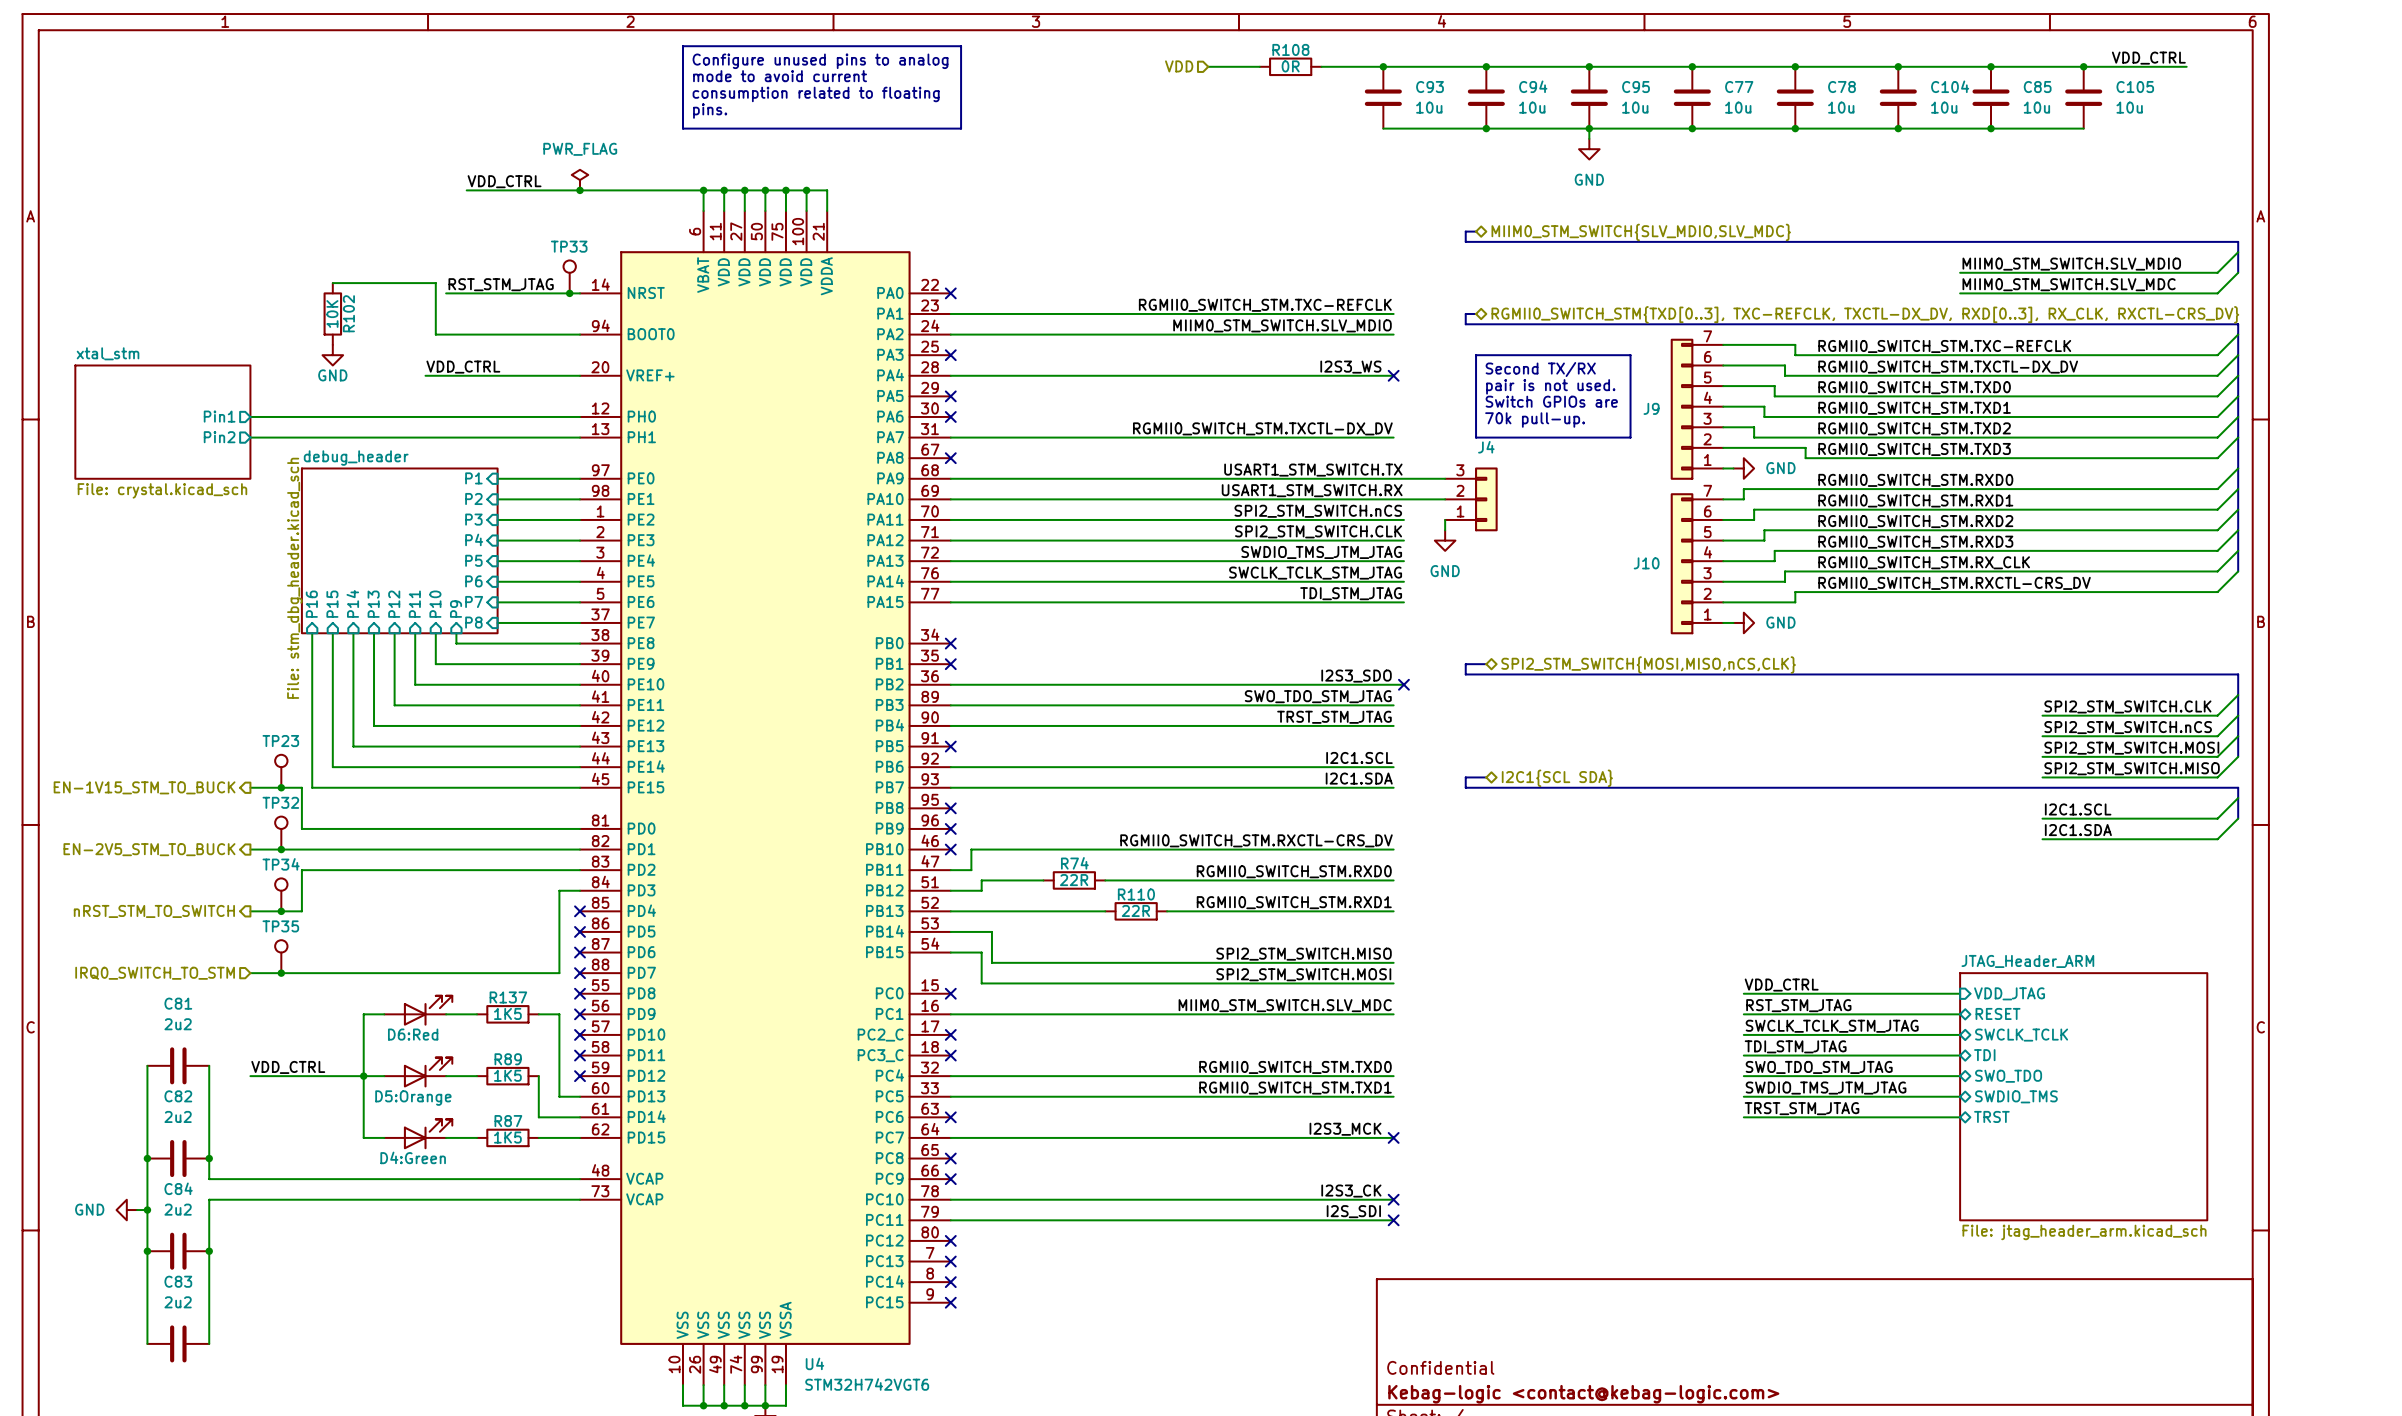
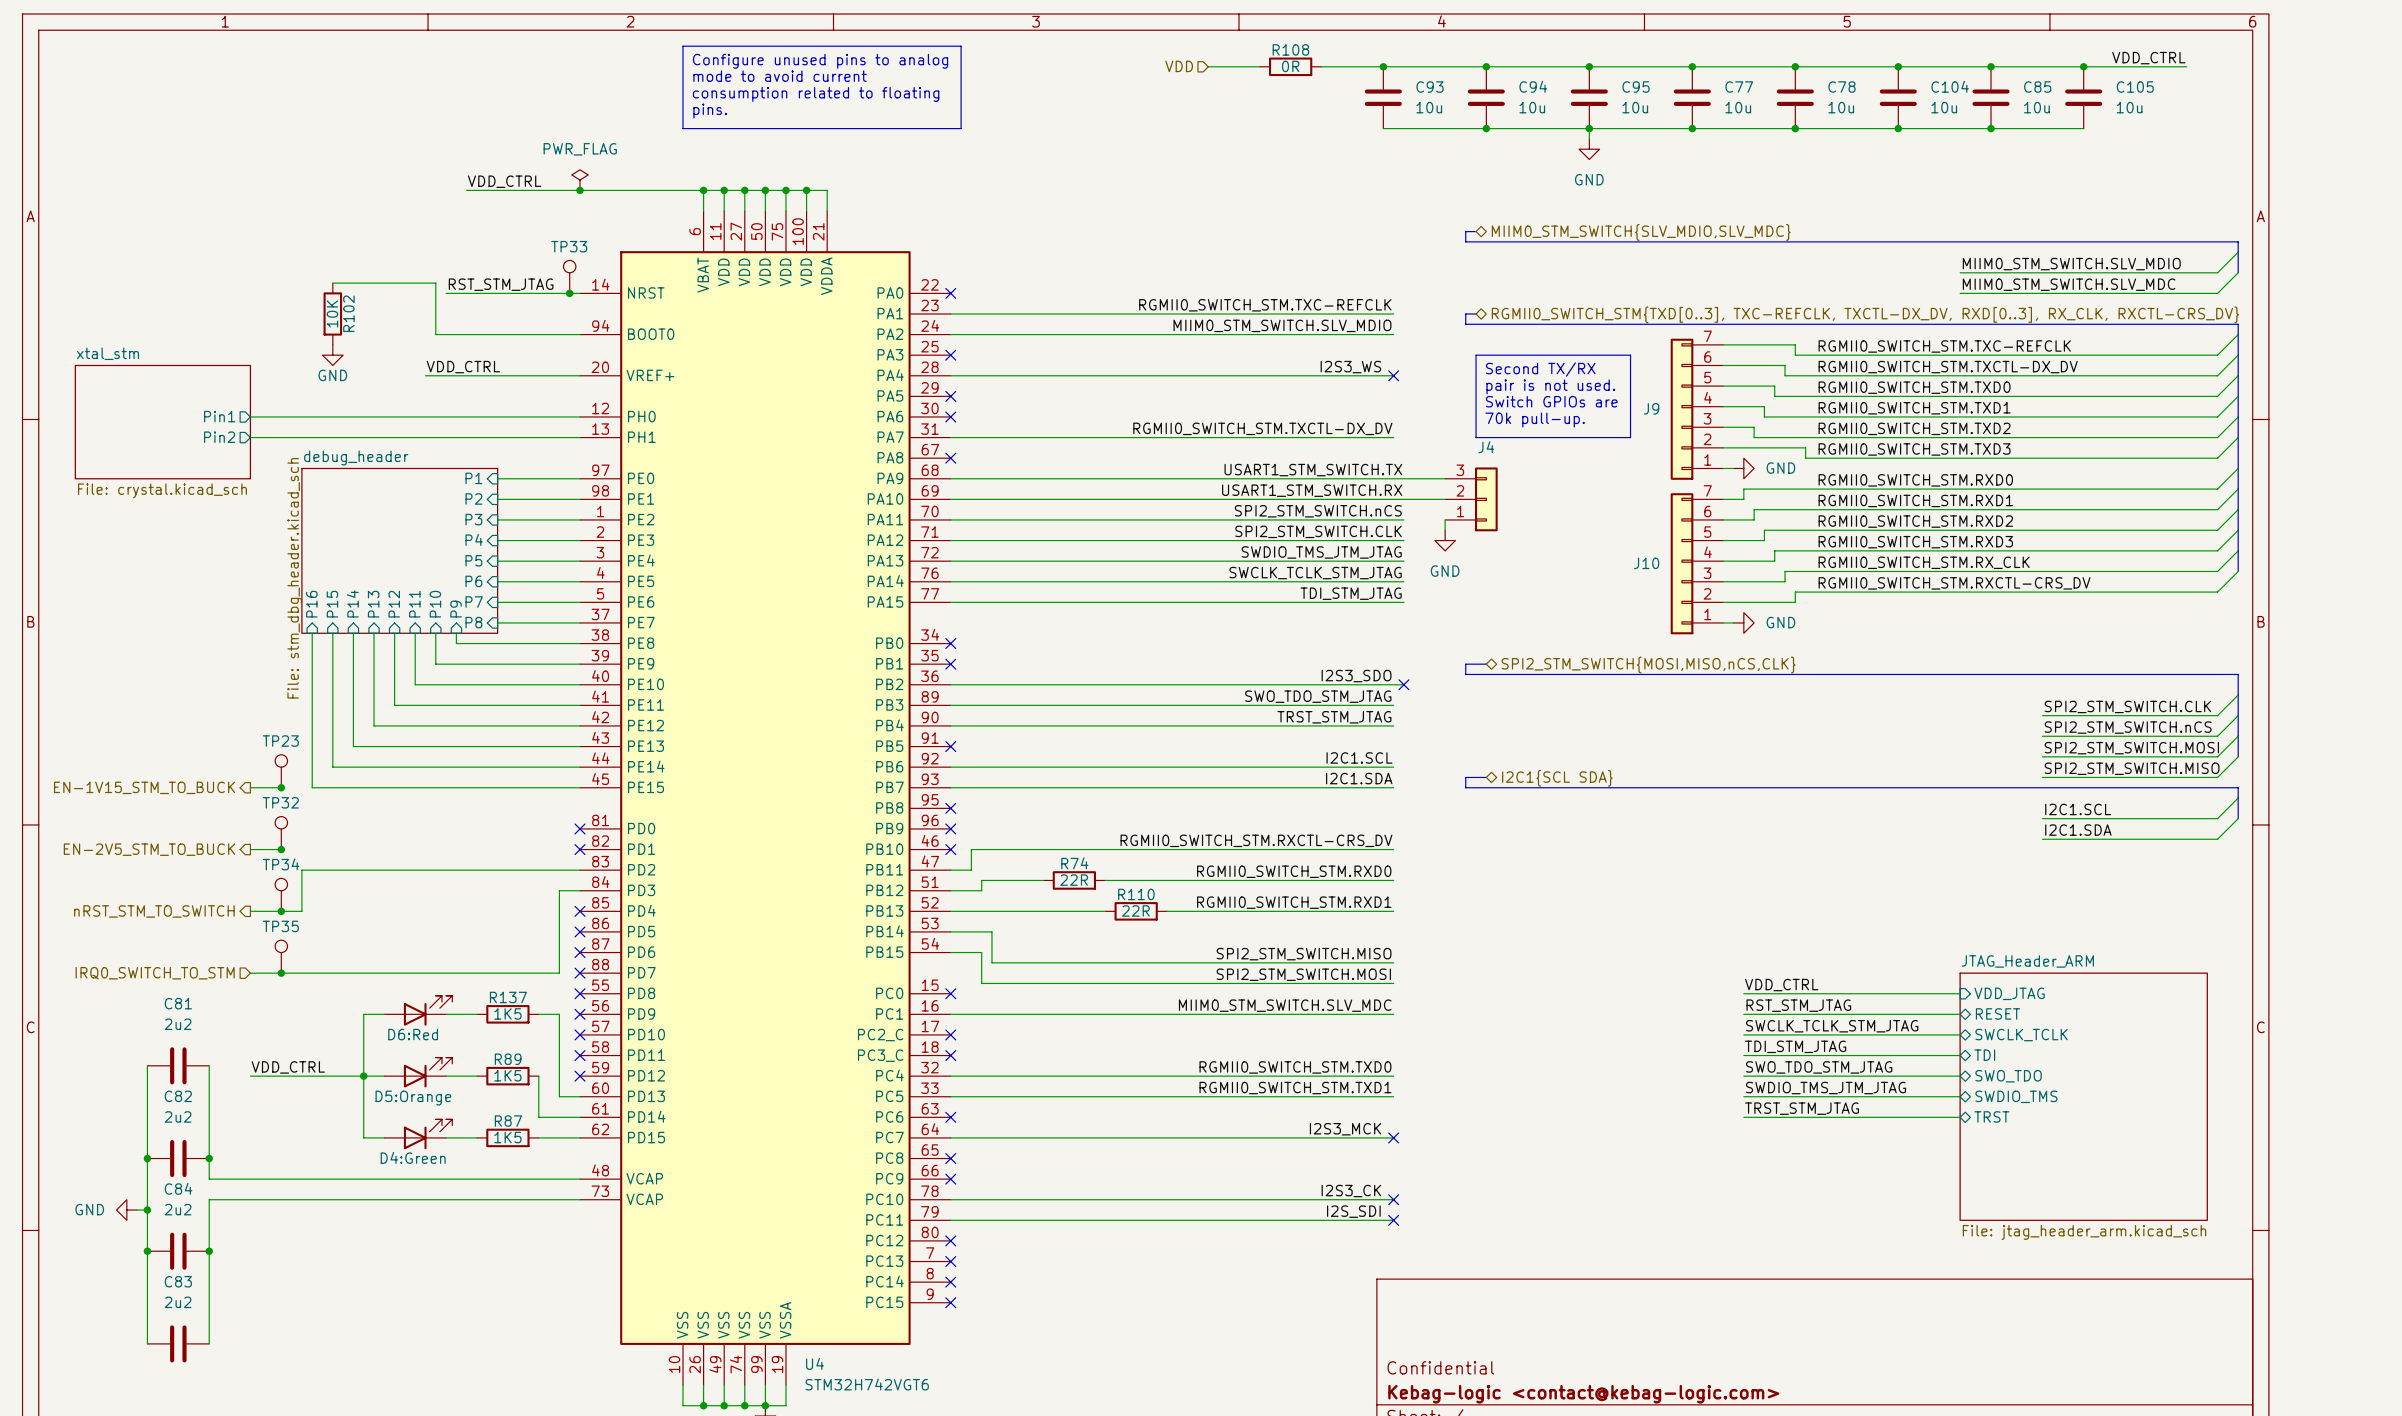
wire: (281, 787) (301, 787) (301, 828) (580, 828) -> none
no-connect mark: none -> (580, 828)
wire: (281, 849) (580, 849) -> none
no-connect mark: none -> (580, 849)

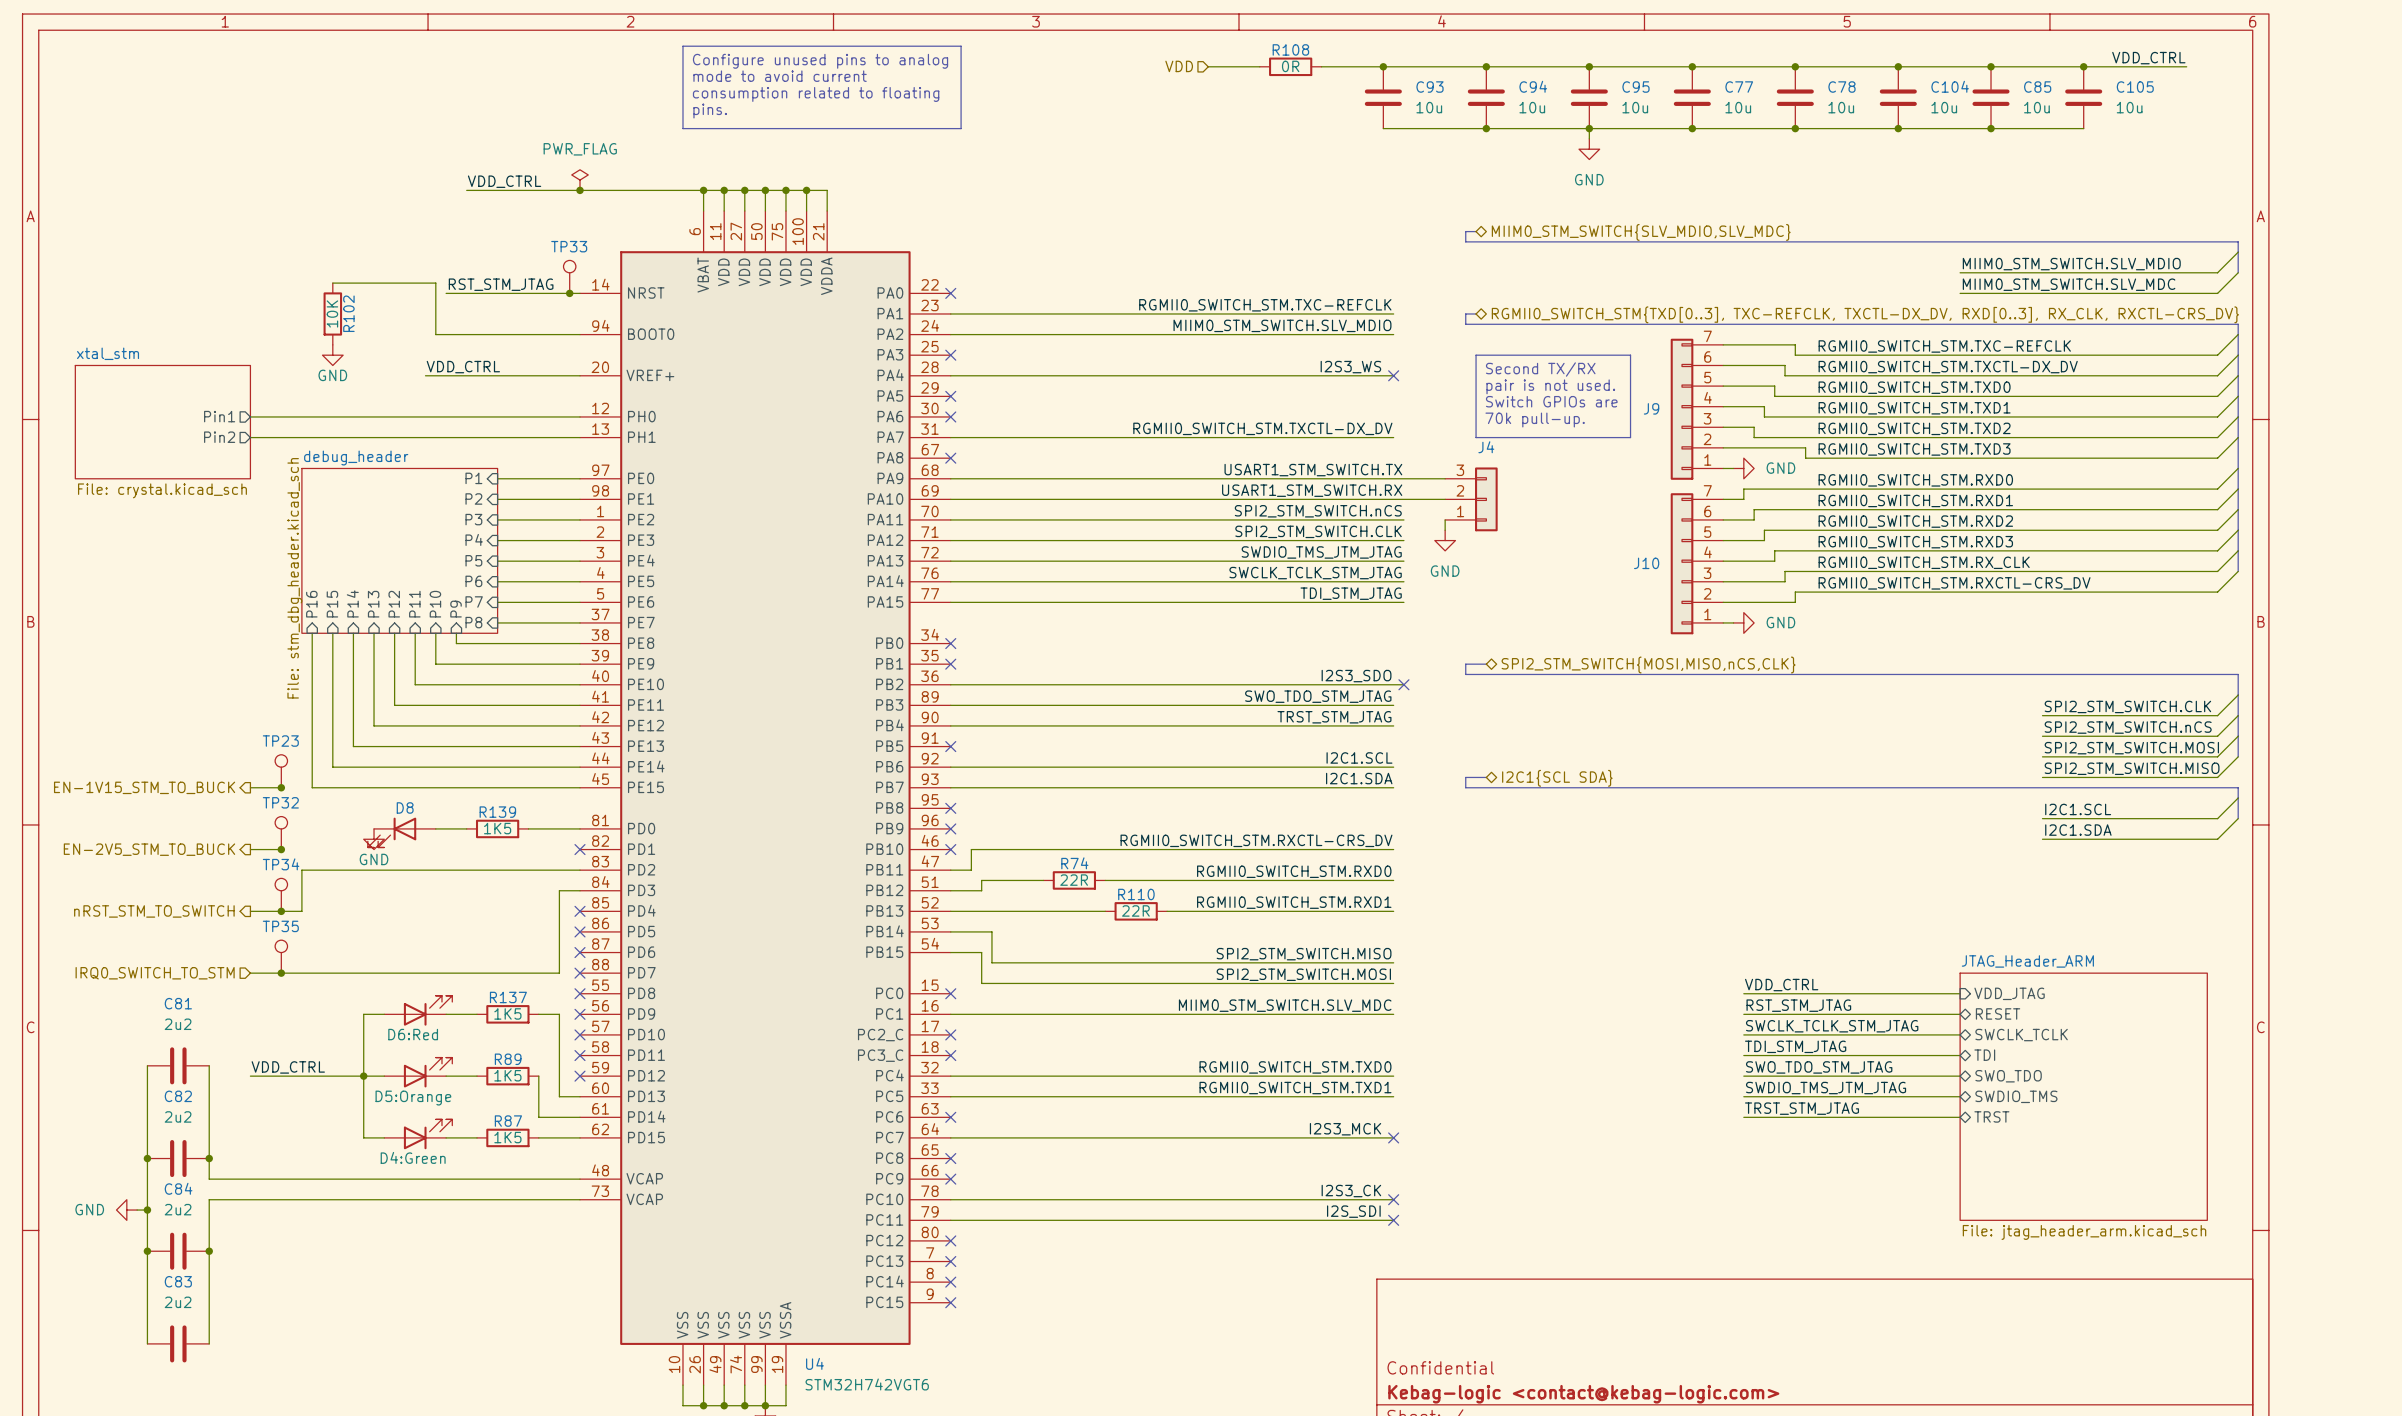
wire: none -> (435, 828) (466, 828)
R139: none -> 1K5 (497, 828)
wire: none -> (528, 828) (580, 828)
no-connect mark: (580, 828) -> none
D8: none -> (401, 832)
power symbol: none -> GND (374, 839)

